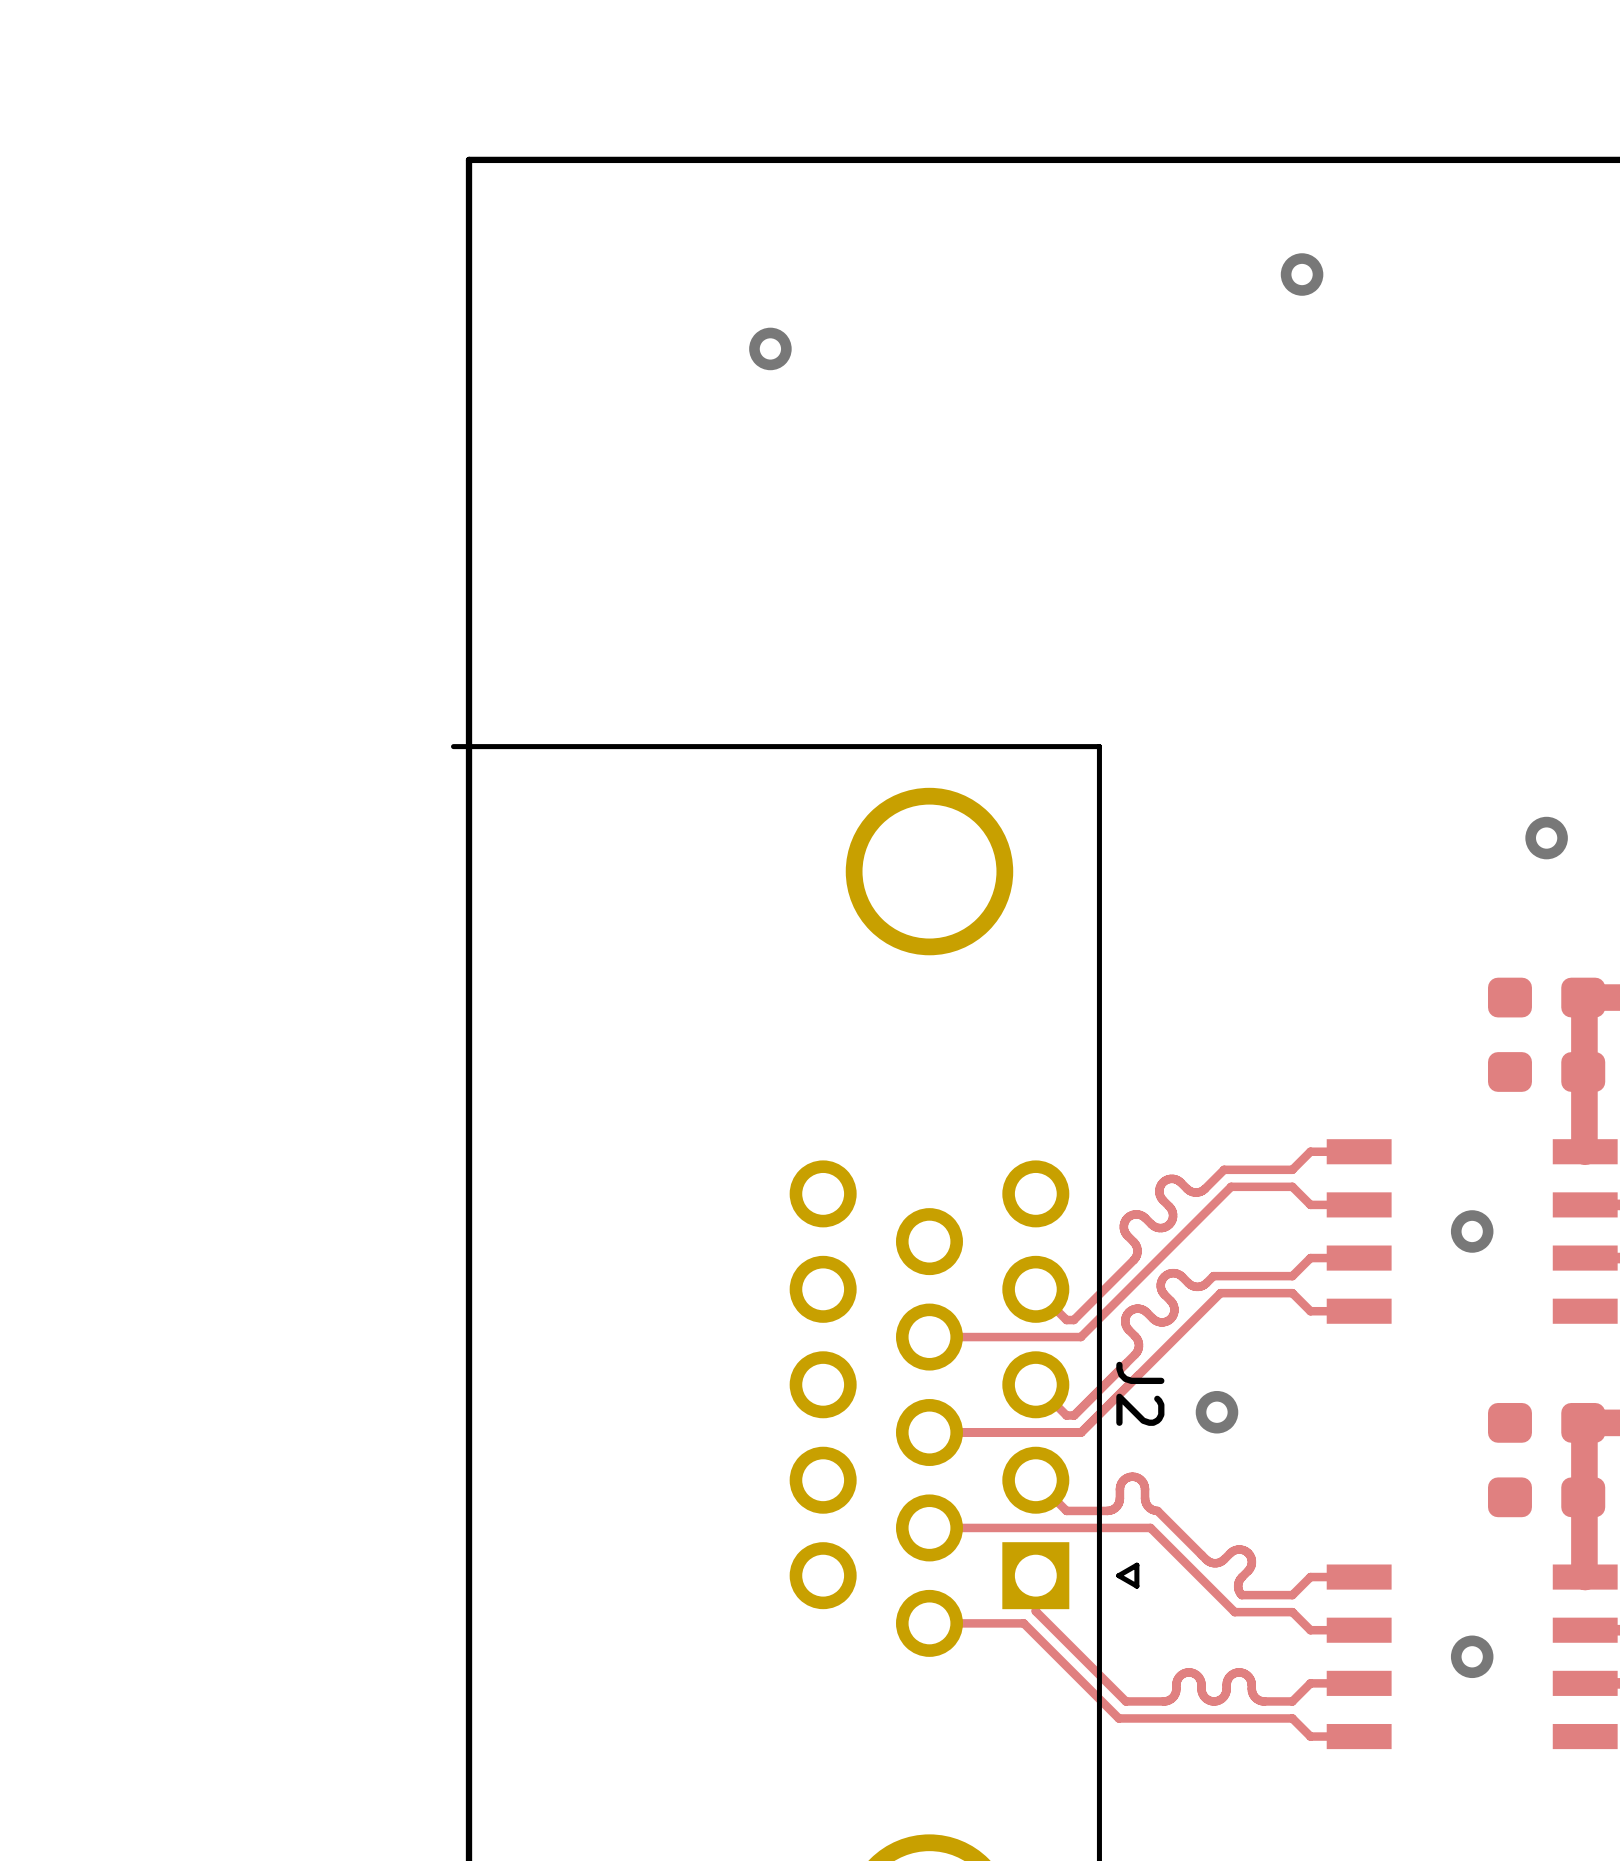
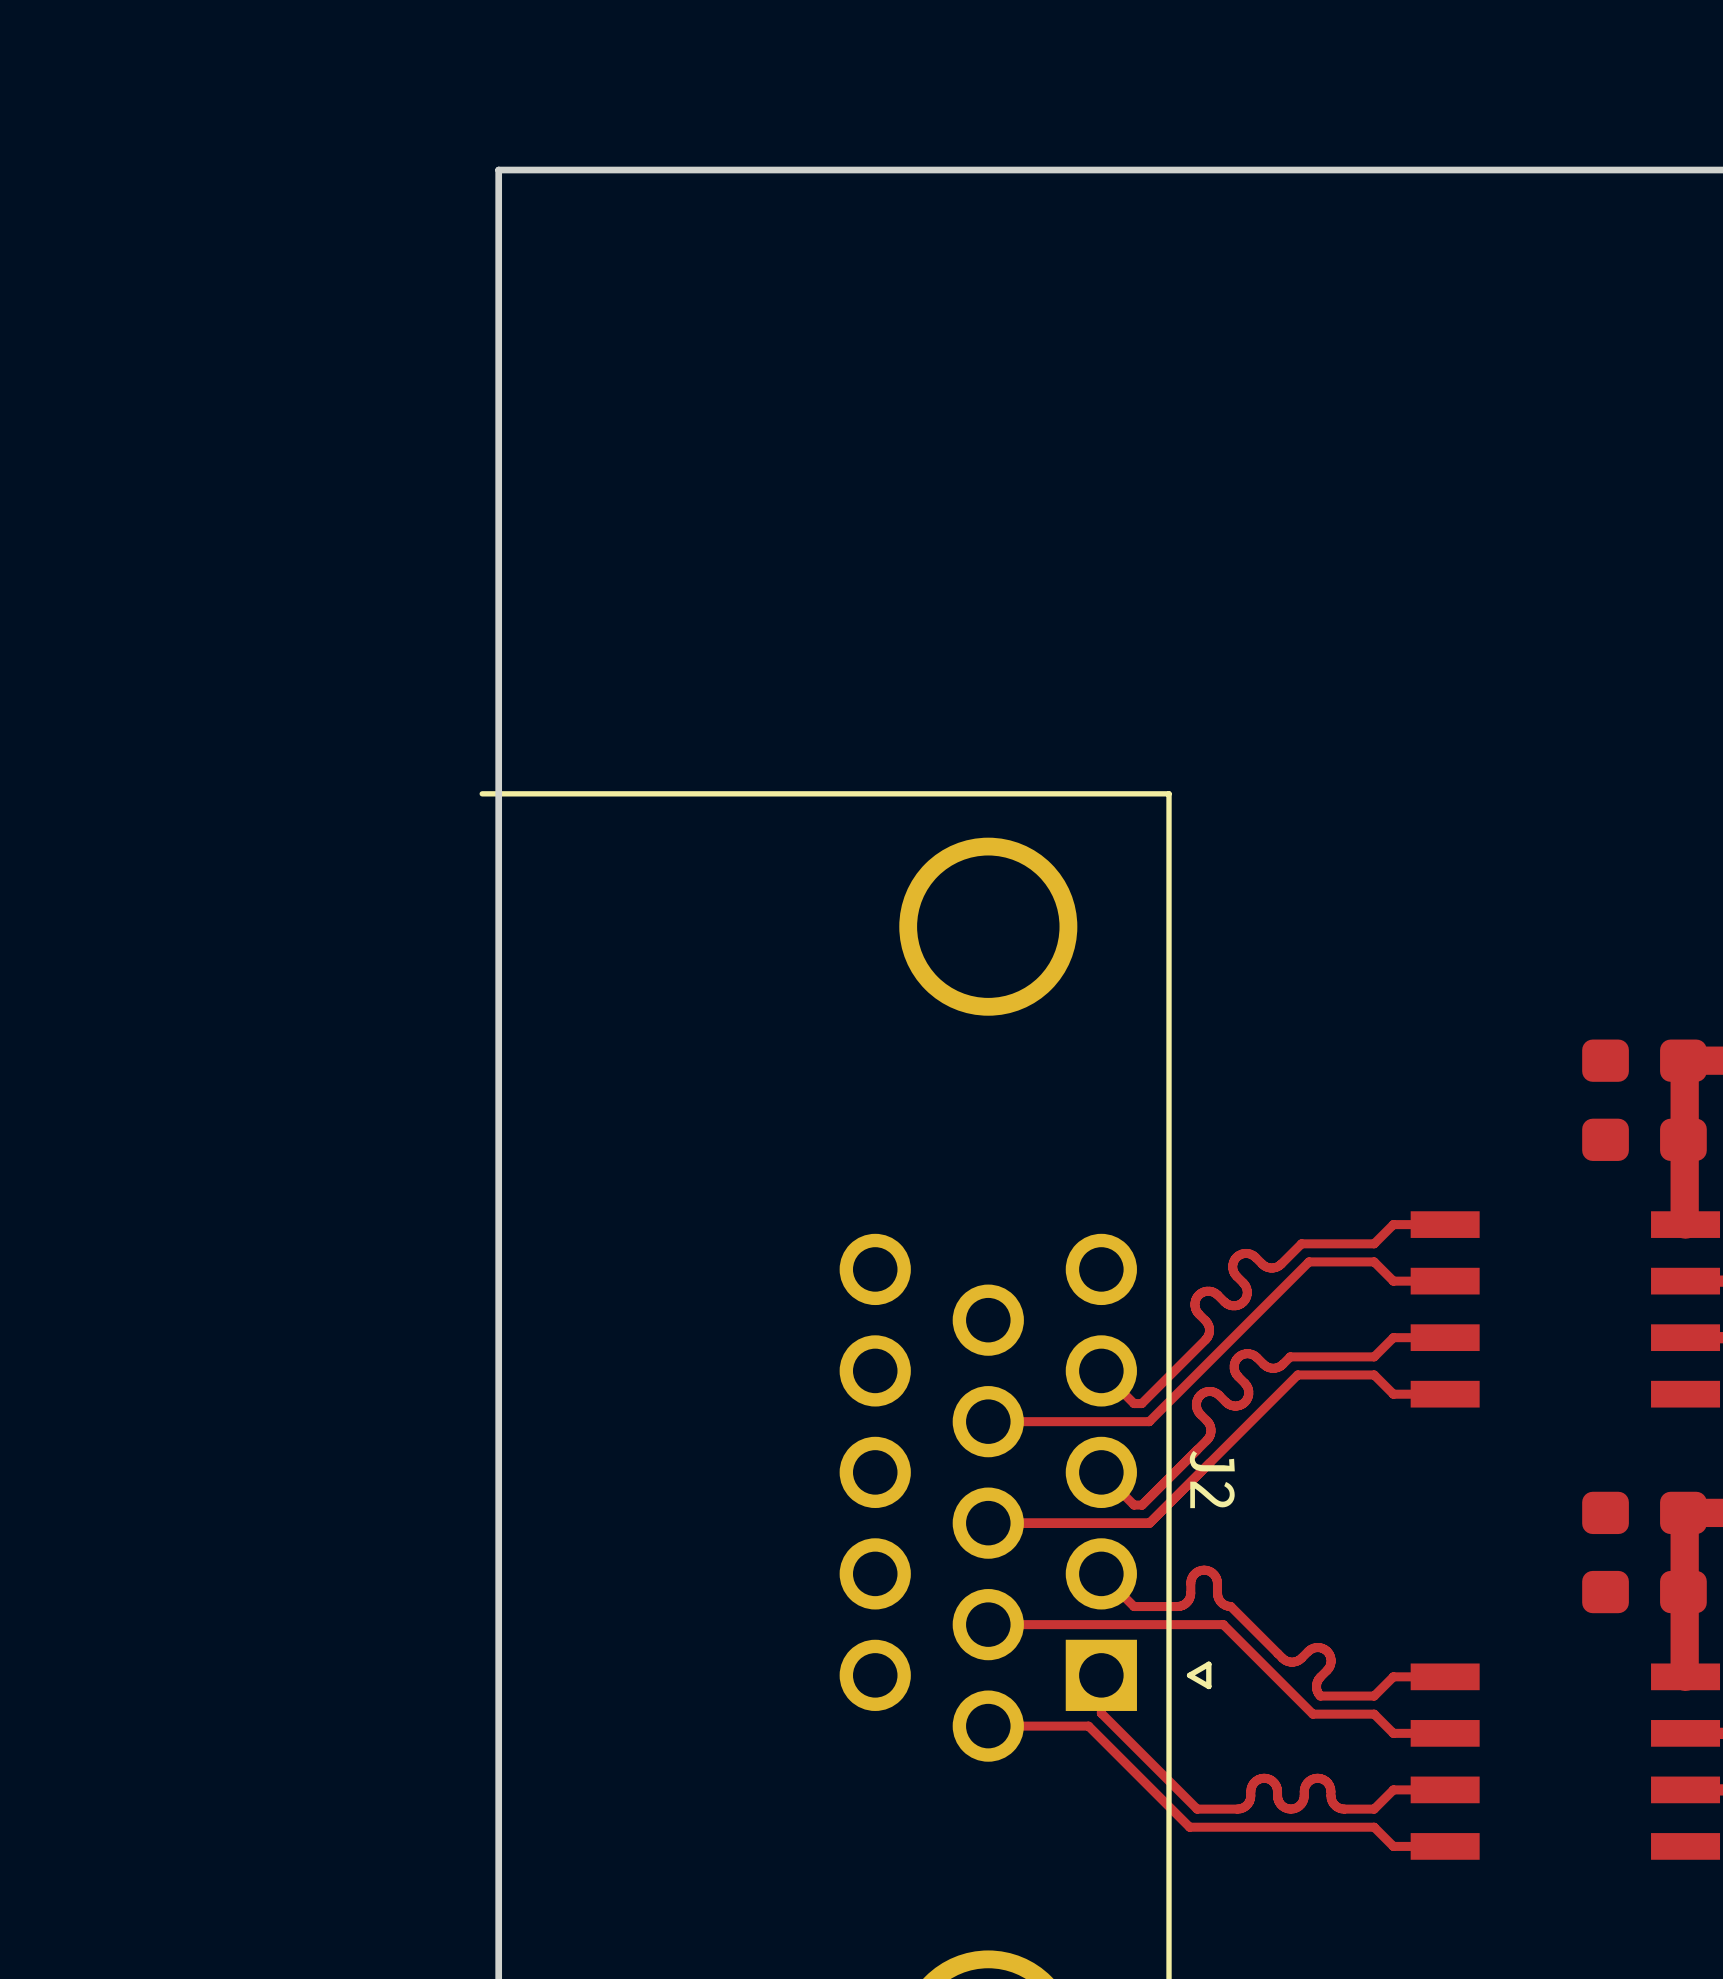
via: (1302, 274) -> none
via: (770, 348) -> none
via: (1546, 838) -> none
via: (1472, 1231) -> none
via: (1217, 1412) -> none
via: (1472, 1656) -> none

